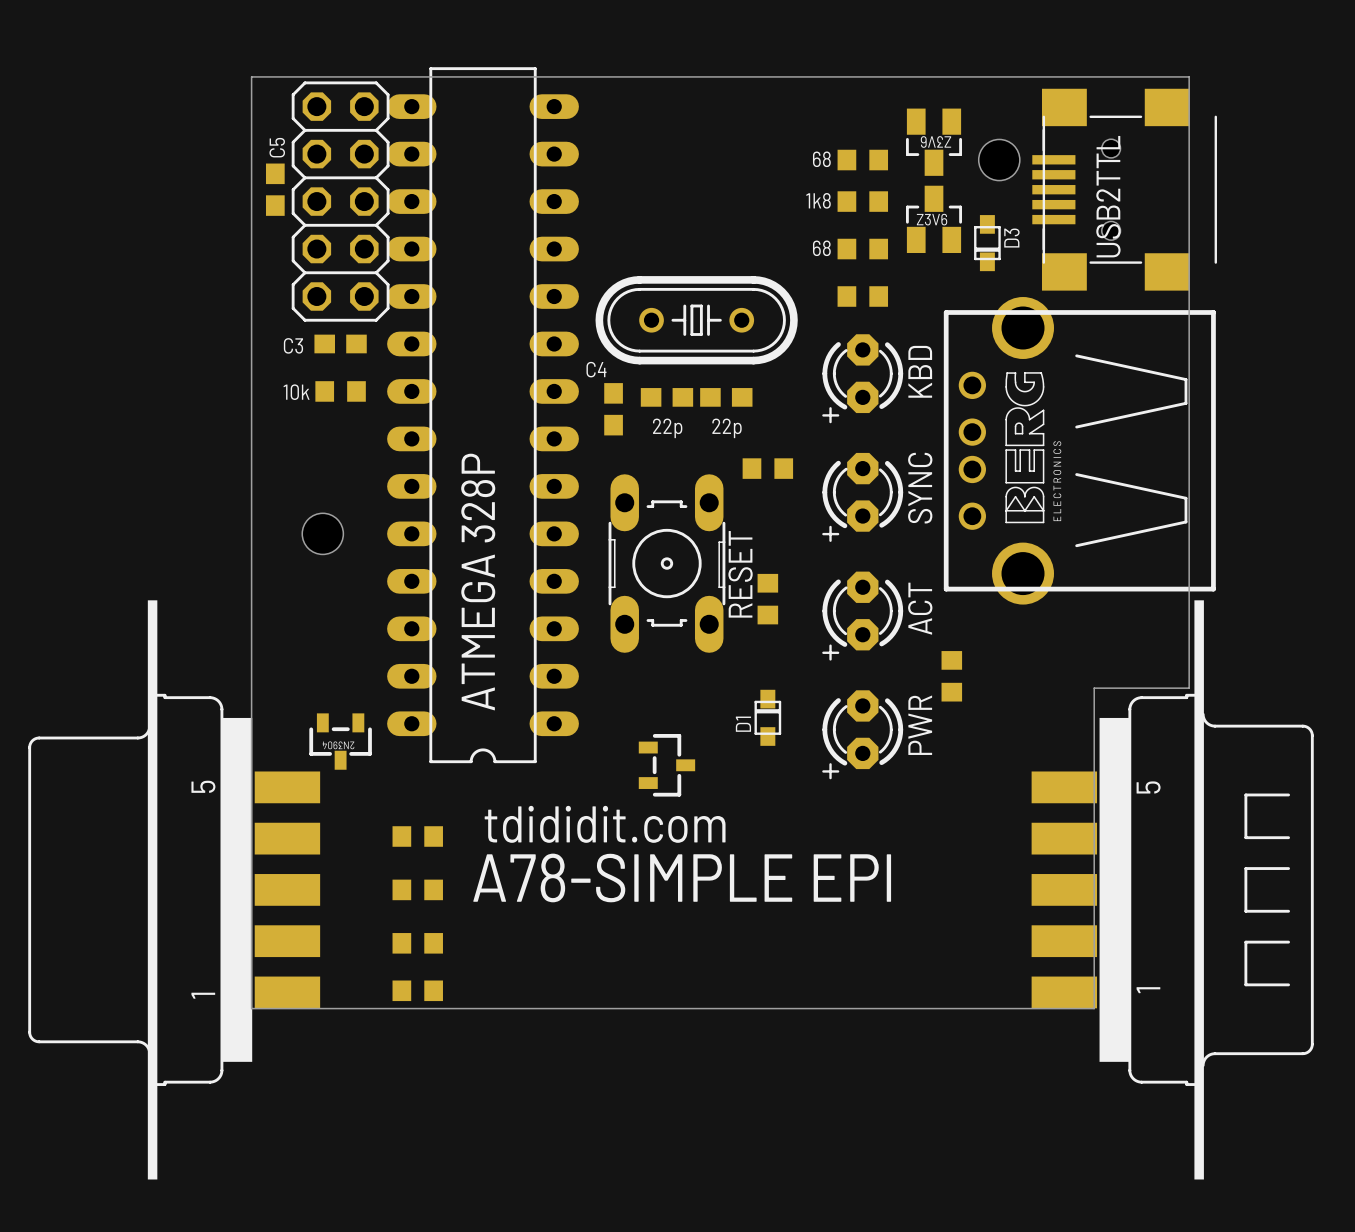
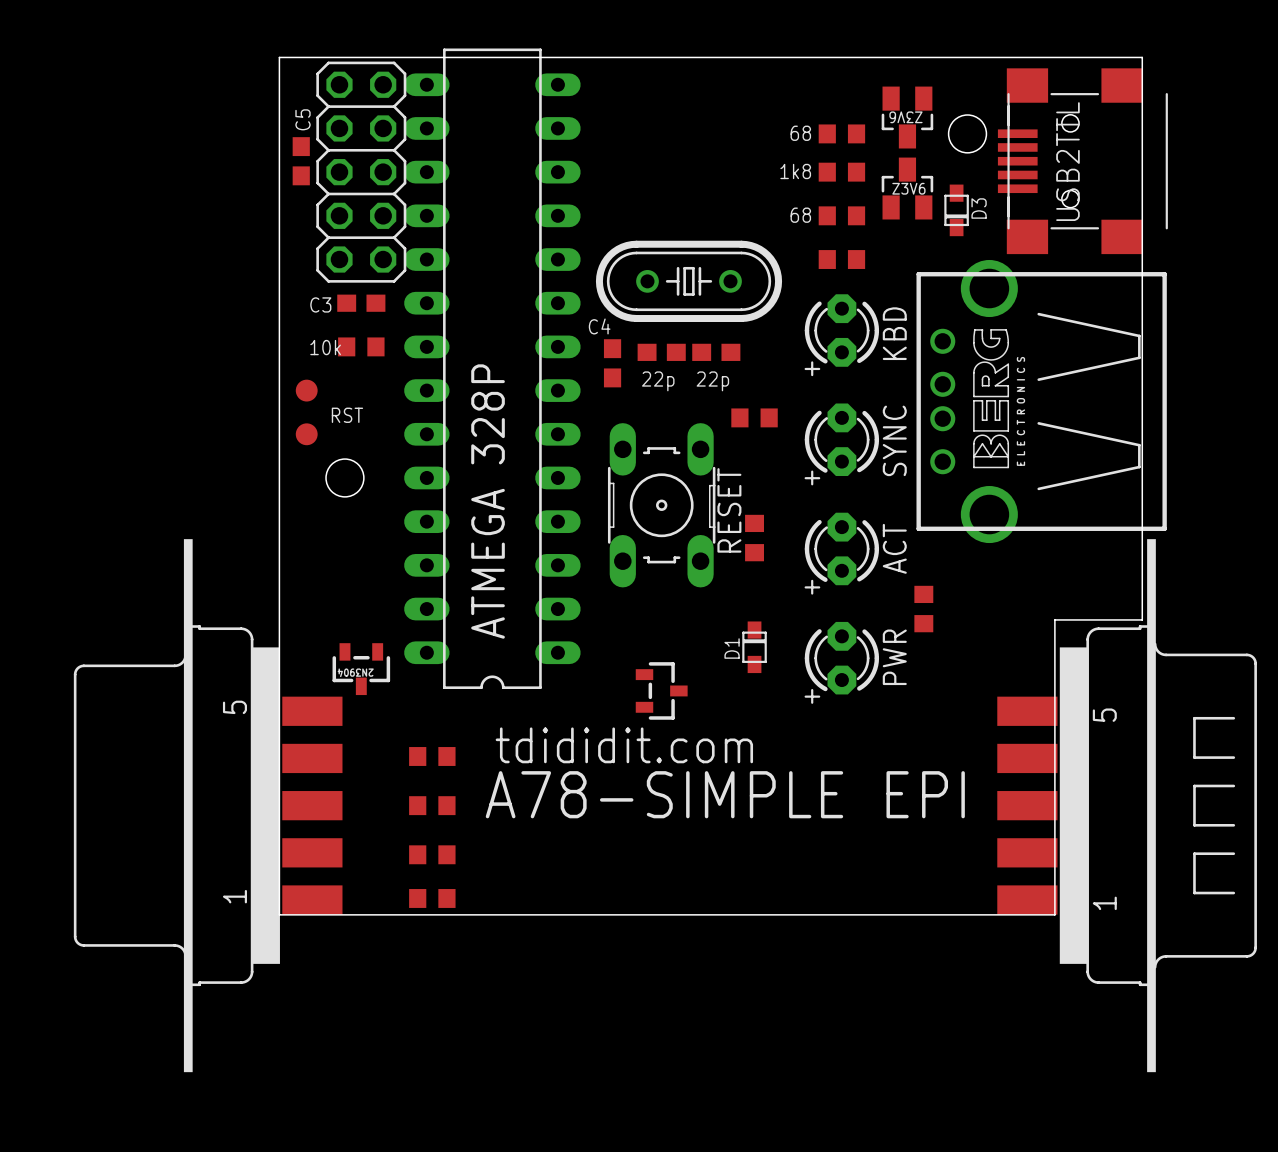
RST: none -> (306, 390)
part: none -> (306, 434)

